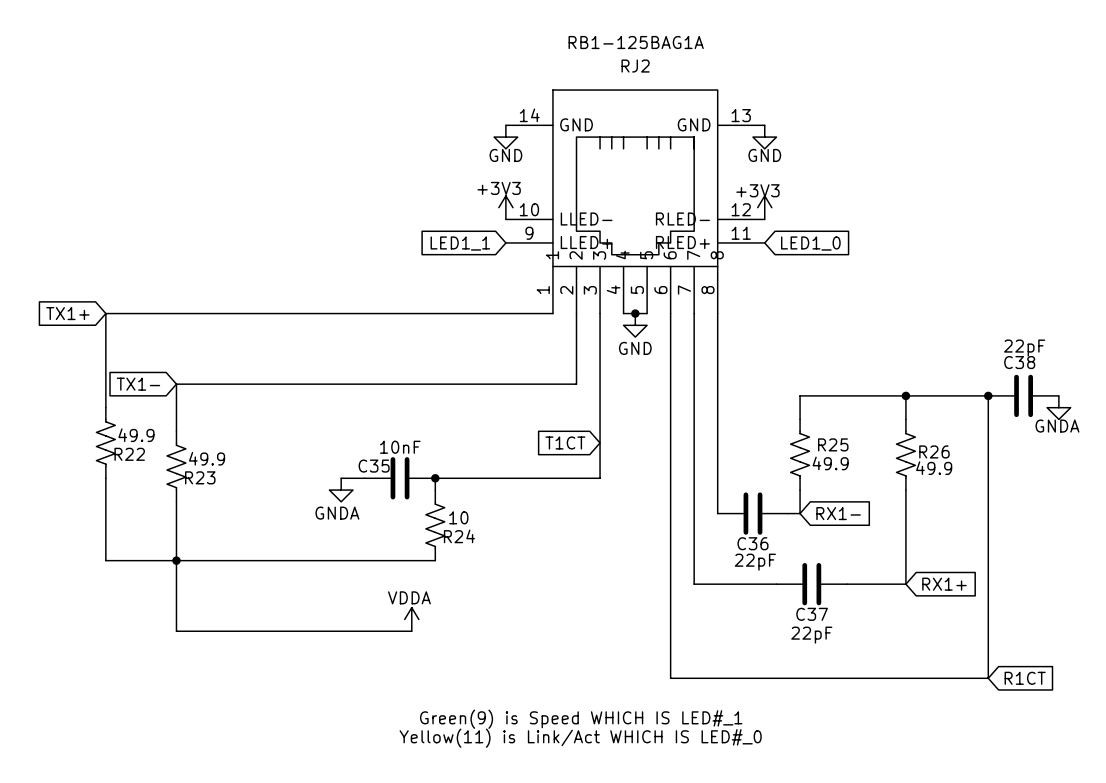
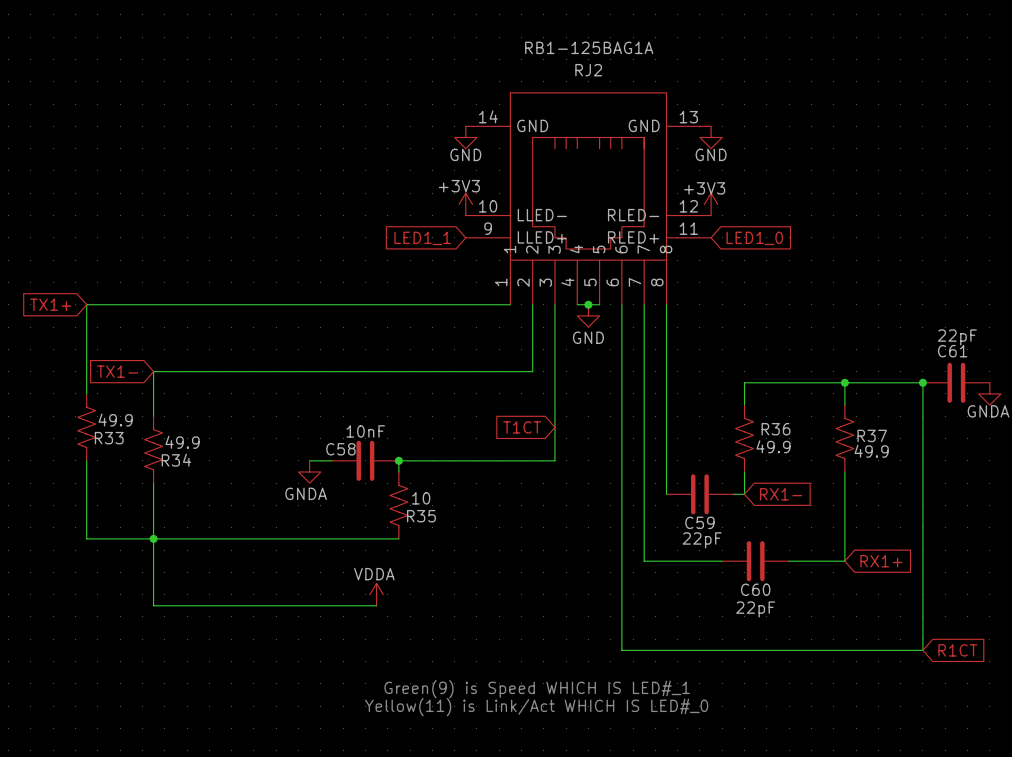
C38 name: C38 (1019, 362) -> C61 (952, 351)
R25 name: R25 (833, 444) -> R36 (776, 429)
R26 name: R26 (934, 451) -> R37 (872, 435)
R22 name: R22 (129, 454) -> R33 (109, 438)
C35 name: C35 (374, 466) -> C58 (340, 449)
R23 name: R23 (200, 477) -> R34 (176, 460)
R24 name: R24 (459, 536) -> R35 (421, 516)
C36 name: C36 (752, 543) -> C59 (699, 522)
C37 name: C37 (812, 614) -> C60 (755, 589)

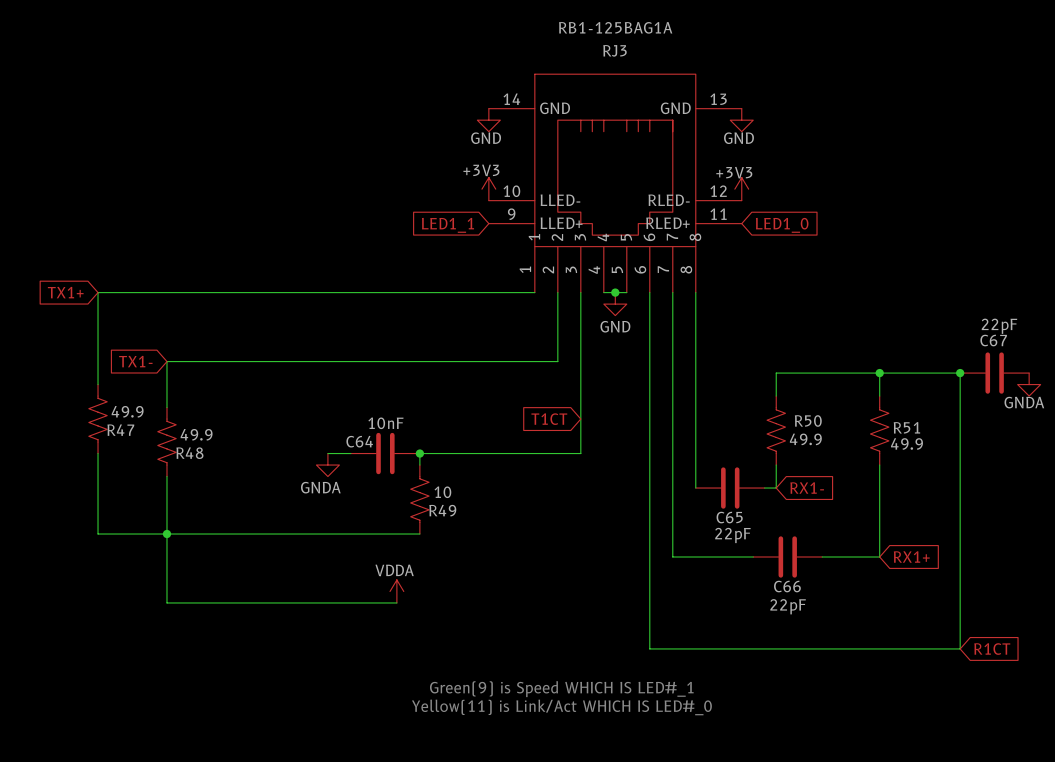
RJ2 name: RJ2 (588, 70) -> RJ3 (614, 50)
C61 name: C61 (952, 351) -> C67 (993, 340)
R36 name: R36 (776, 429) -> R50 (808, 421)
R37 name: R37 (872, 435) -> R51 (906, 427)
R33 name: R33 (109, 438) -> R47 (120, 430)
C58 name: C58 (340, 449) -> C64 (359, 441)
R34 name: R34 (176, 460) -> R48 (189, 453)
R35 name: R35 (421, 516) -> R49 (442, 510)
C59 name: C59 (699, 522) -> C65 (729, 517)
C60 name: C60 (755, 589) -> C66 (787, 586)

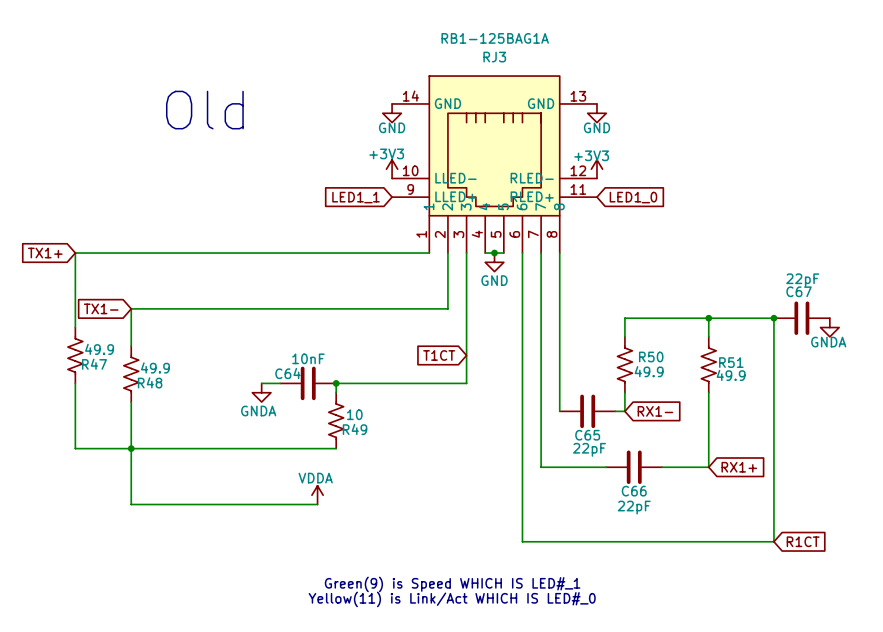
text: none -> Old (204, 110)
text: Green(9) is Speed WHICH IS LED#_1 (561, 689) -> none
text: Yellow(11) is Link/Act WHICH IS LED#_0 (561, 707) -> Green(9) is Speed WHICH IS LED#_1 (452, 584)
text: none -> Yellow(11) is Link/Act WHICH IS LED#_0 (452, 599)

